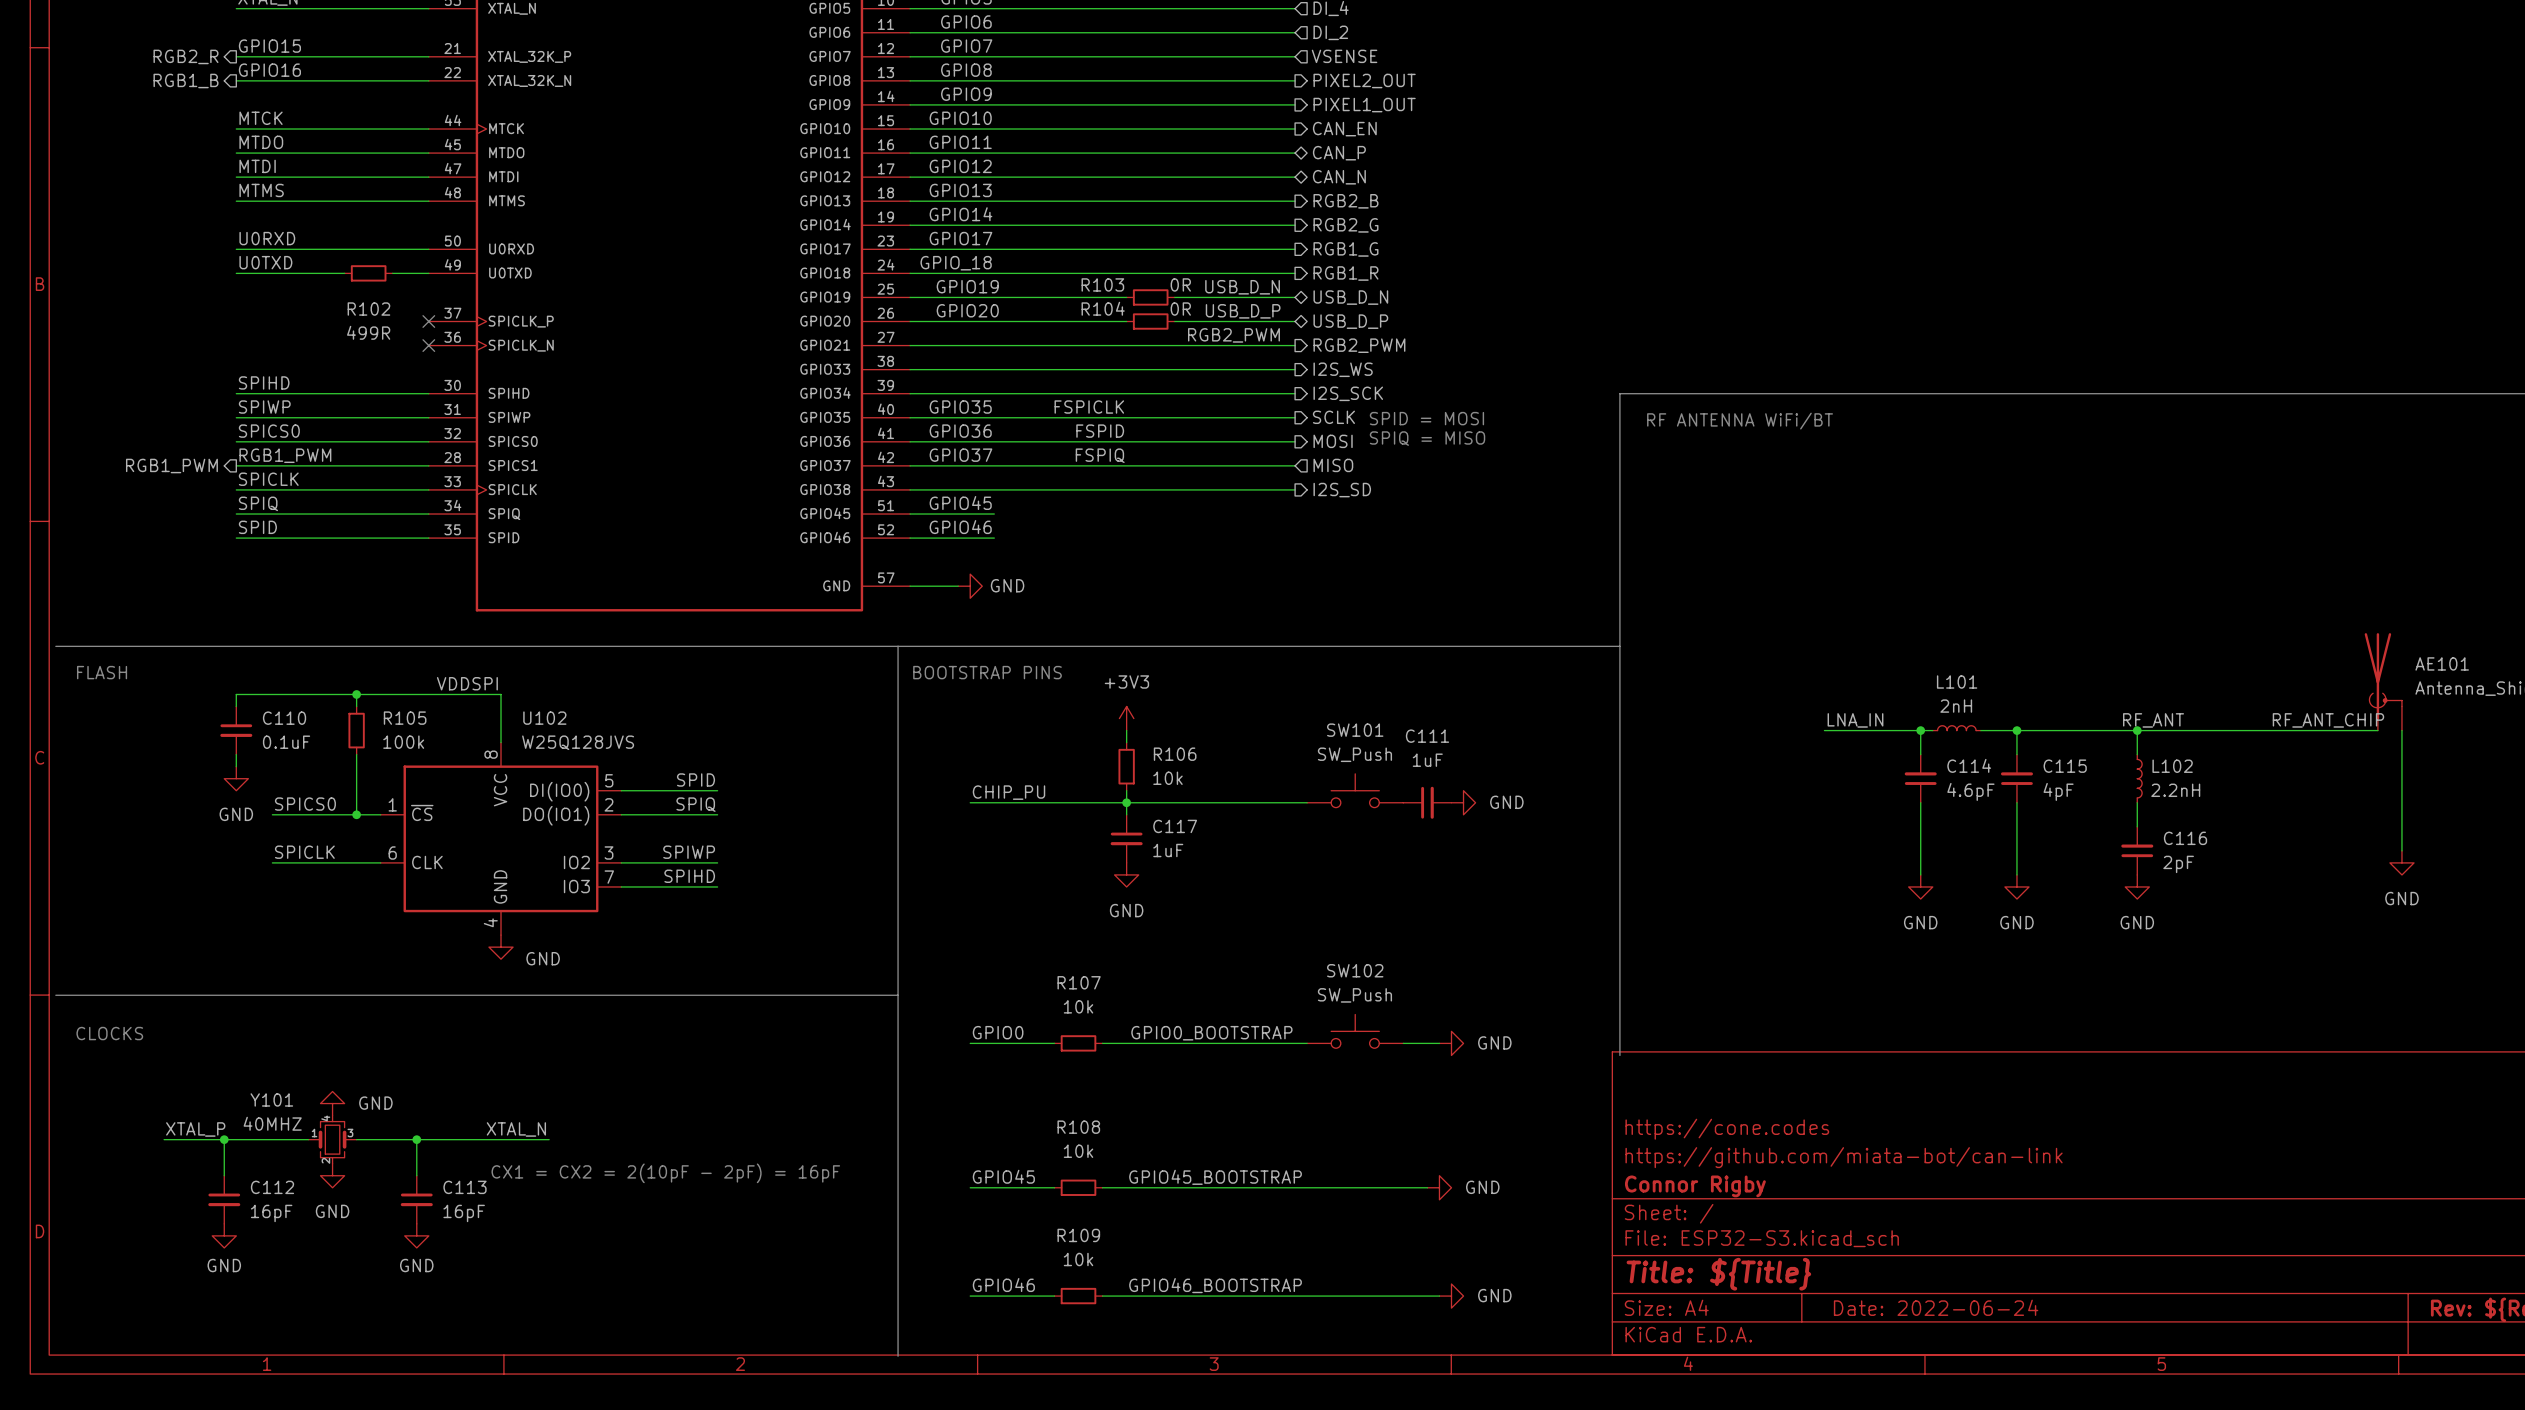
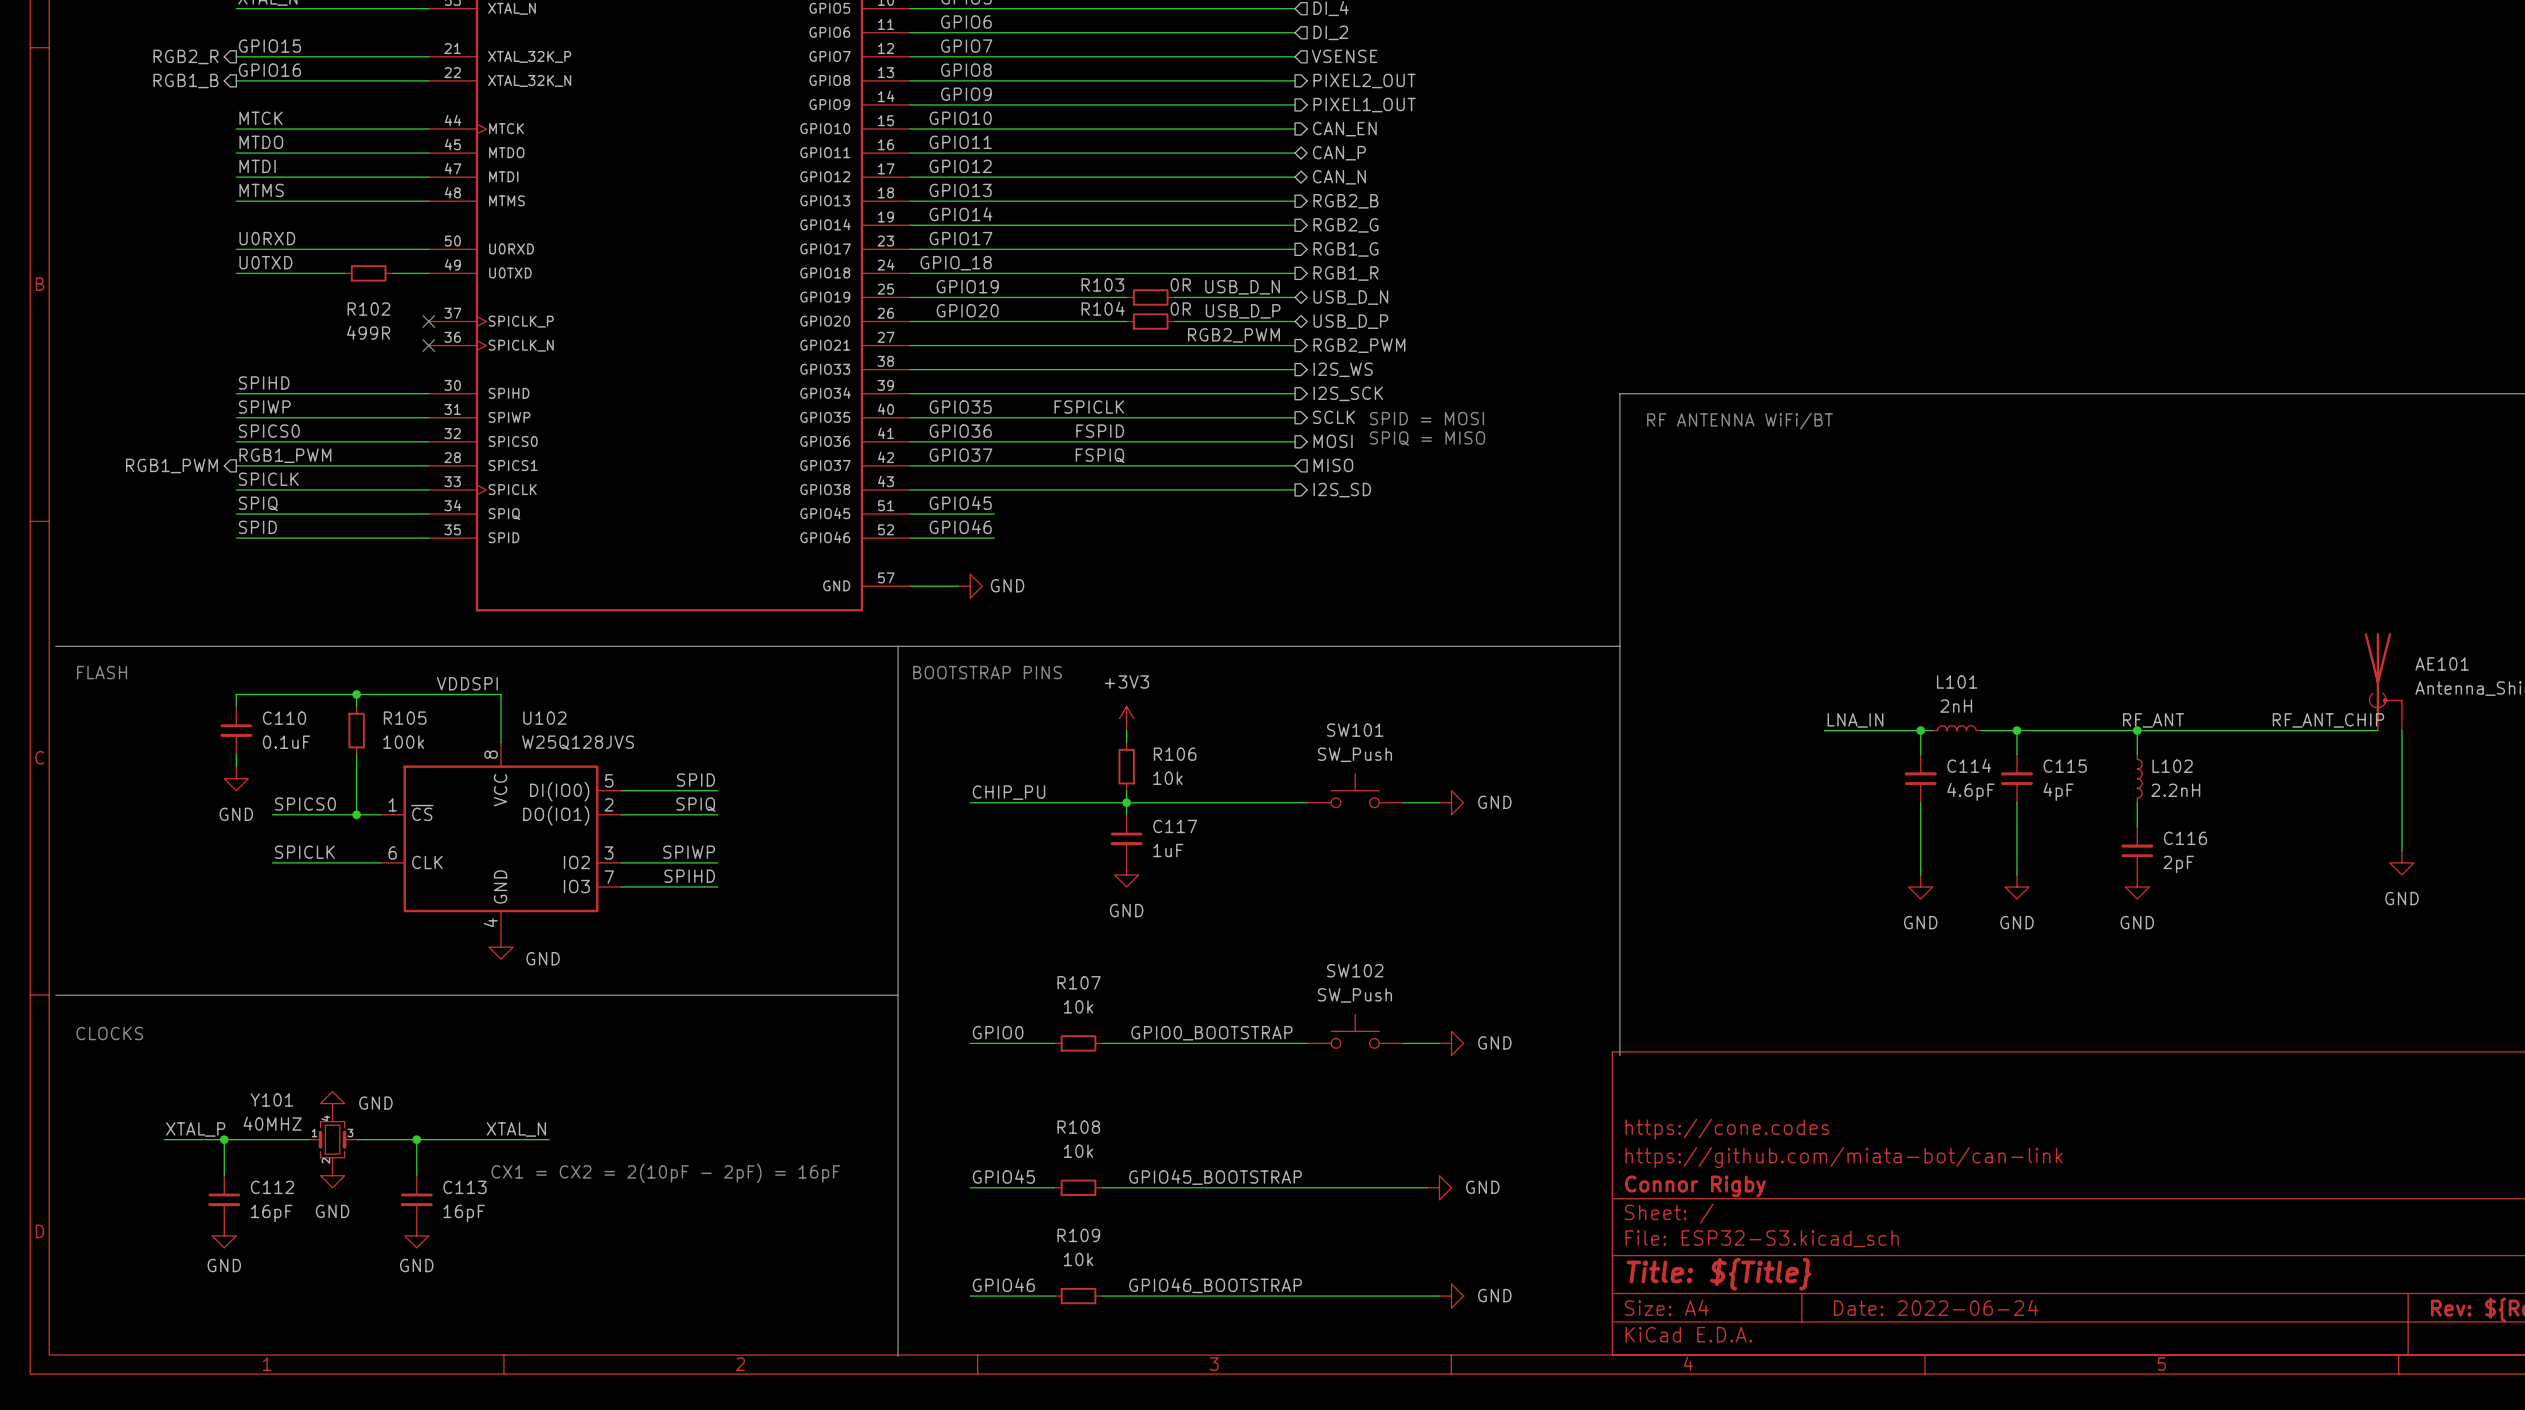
C111: 1uF (1427, 802) -> none
power symbol position: GND (1463, 802) -> GND (1451, 802)

